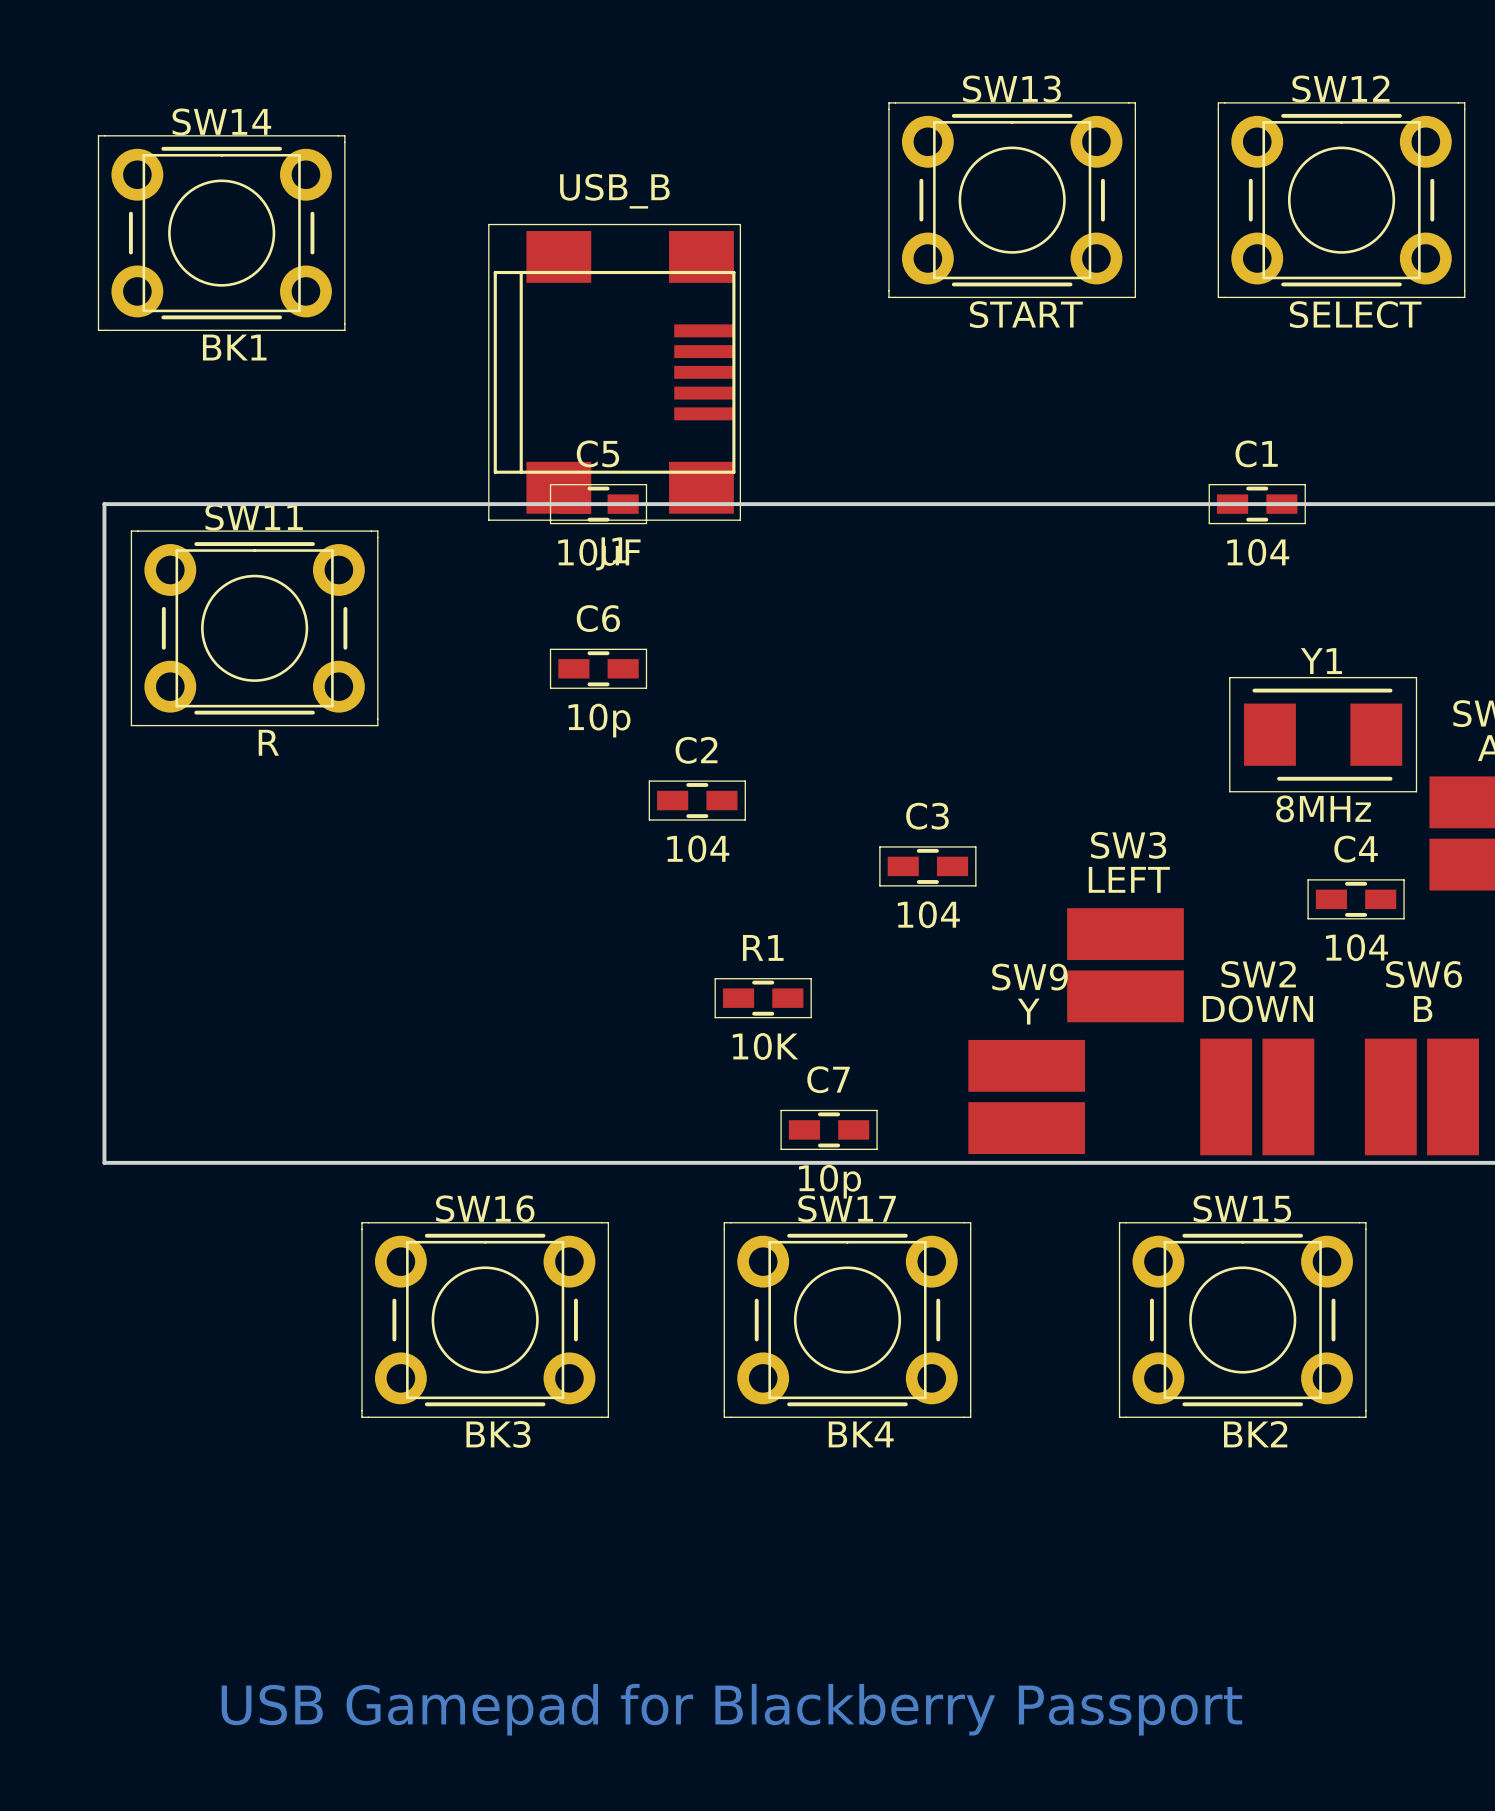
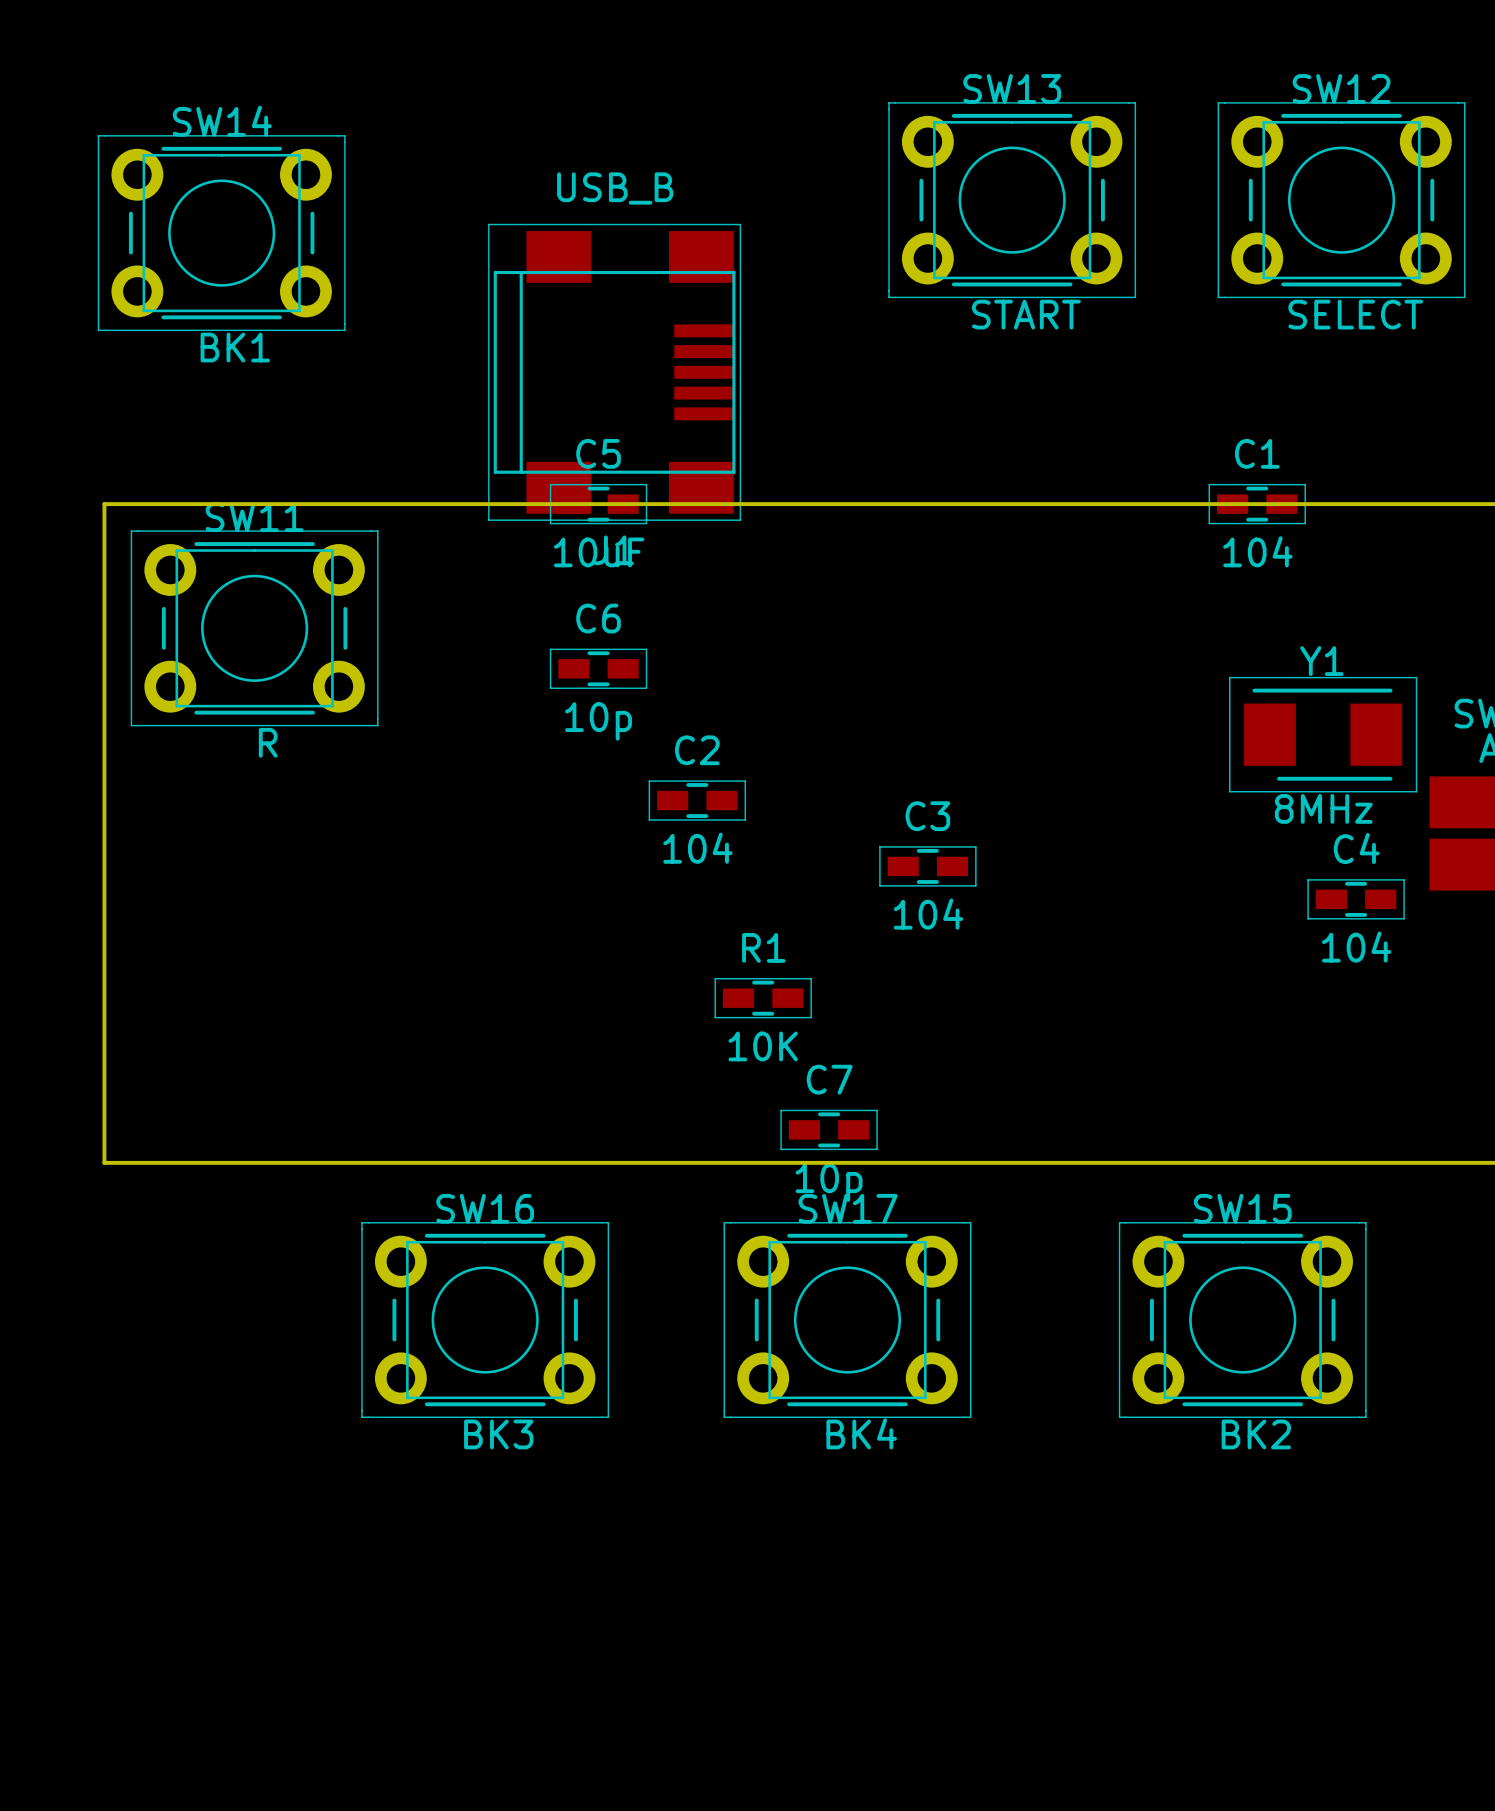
SW3: LEFT (1125, 965) -> none
SW9: Y (1026, 1096) -> none
SW2: DOWN (1257, 1096) -> none
SW6: B (1421, 1096) -> none
text: USB Gamepad for Blackberry Passport (731, 1709) -> none

